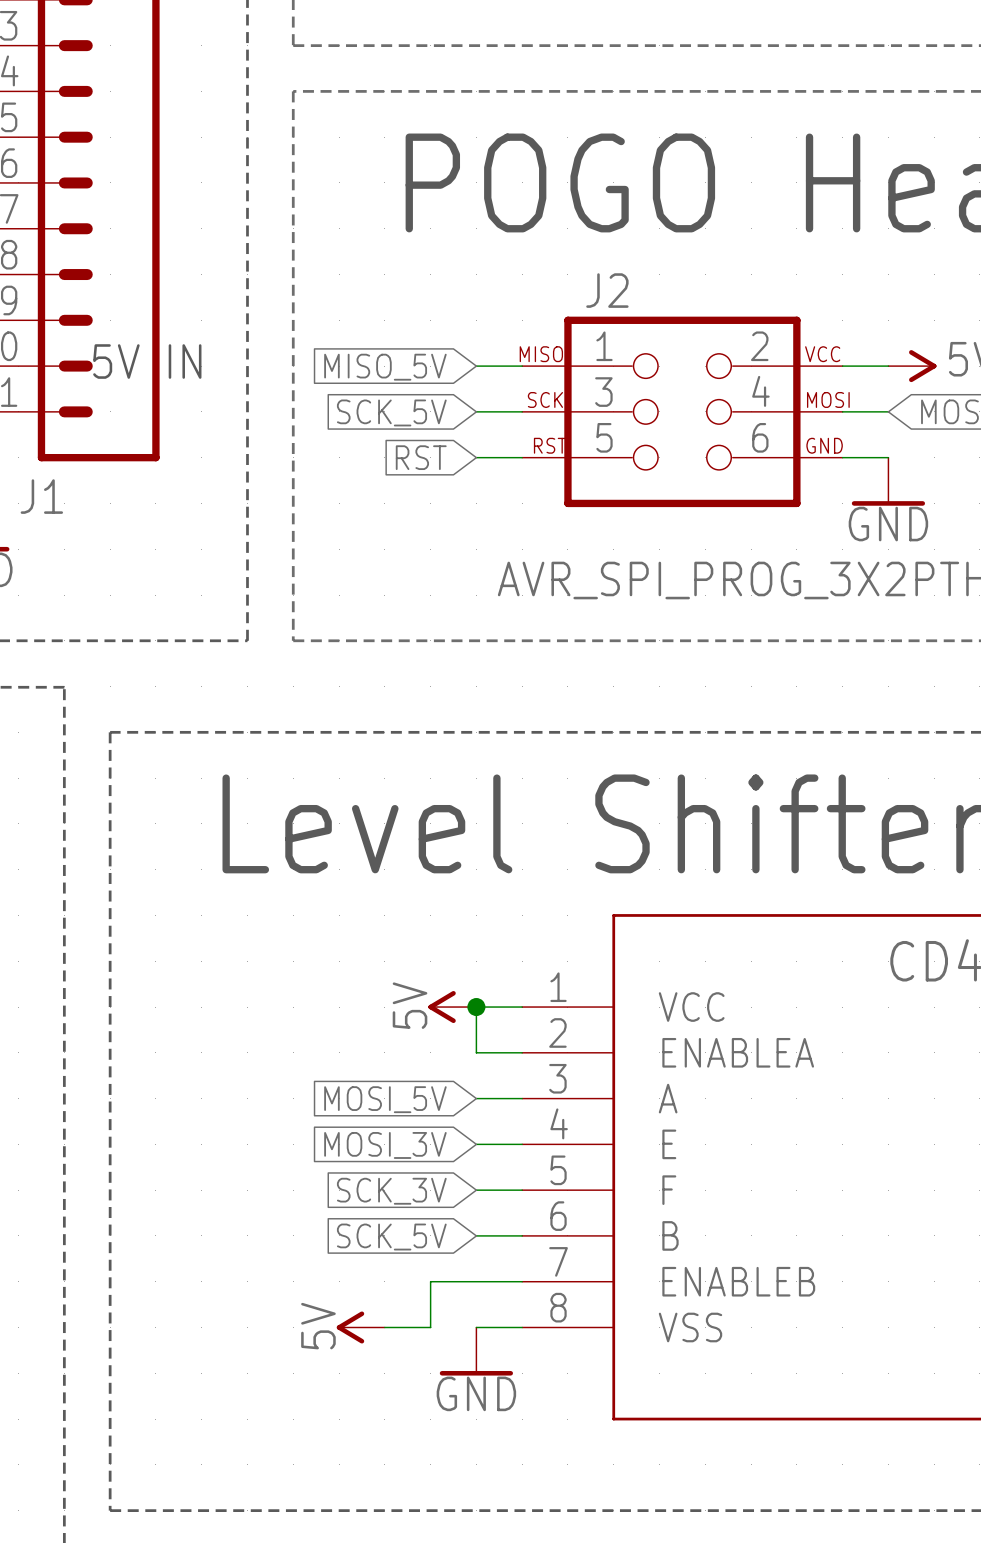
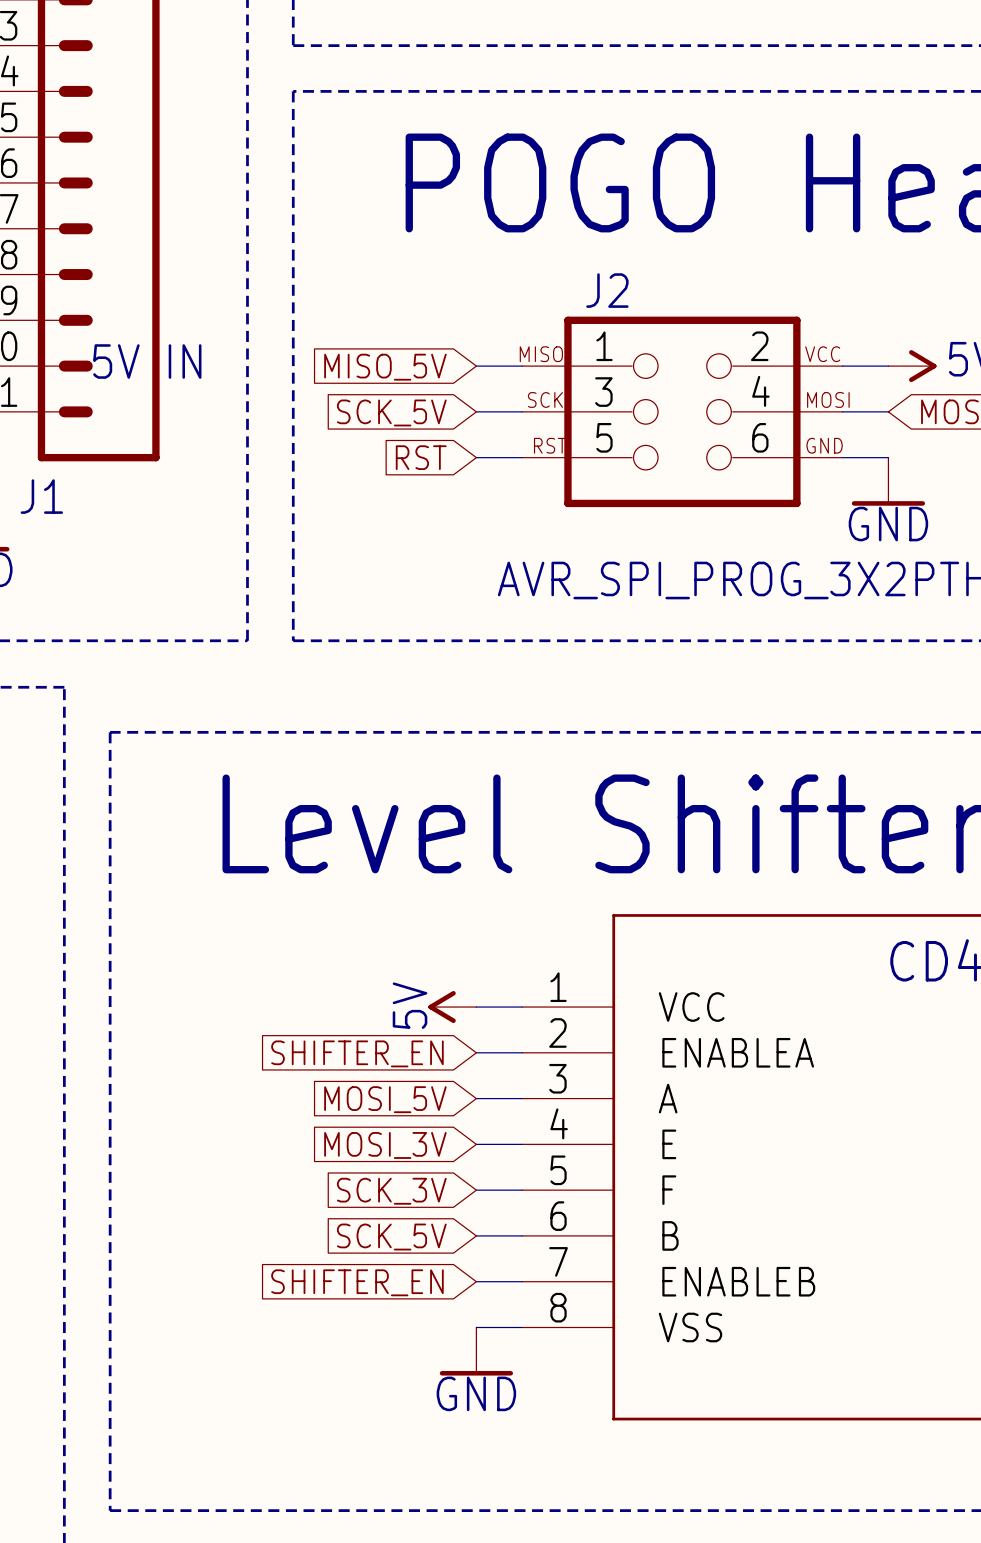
wire: (476, 1007) (476, 1052) -> none
junction: (476, 1007) -> none
global label: none -> SHIFTER_EN (357, 1053)
wire: (476, 1281) (430, 1281) (430, 1327) (384, 1327) -> none
global label: none -> SHIFTER_EN (357, 1282)
power symbol: 5V (360, 1327) -> none

